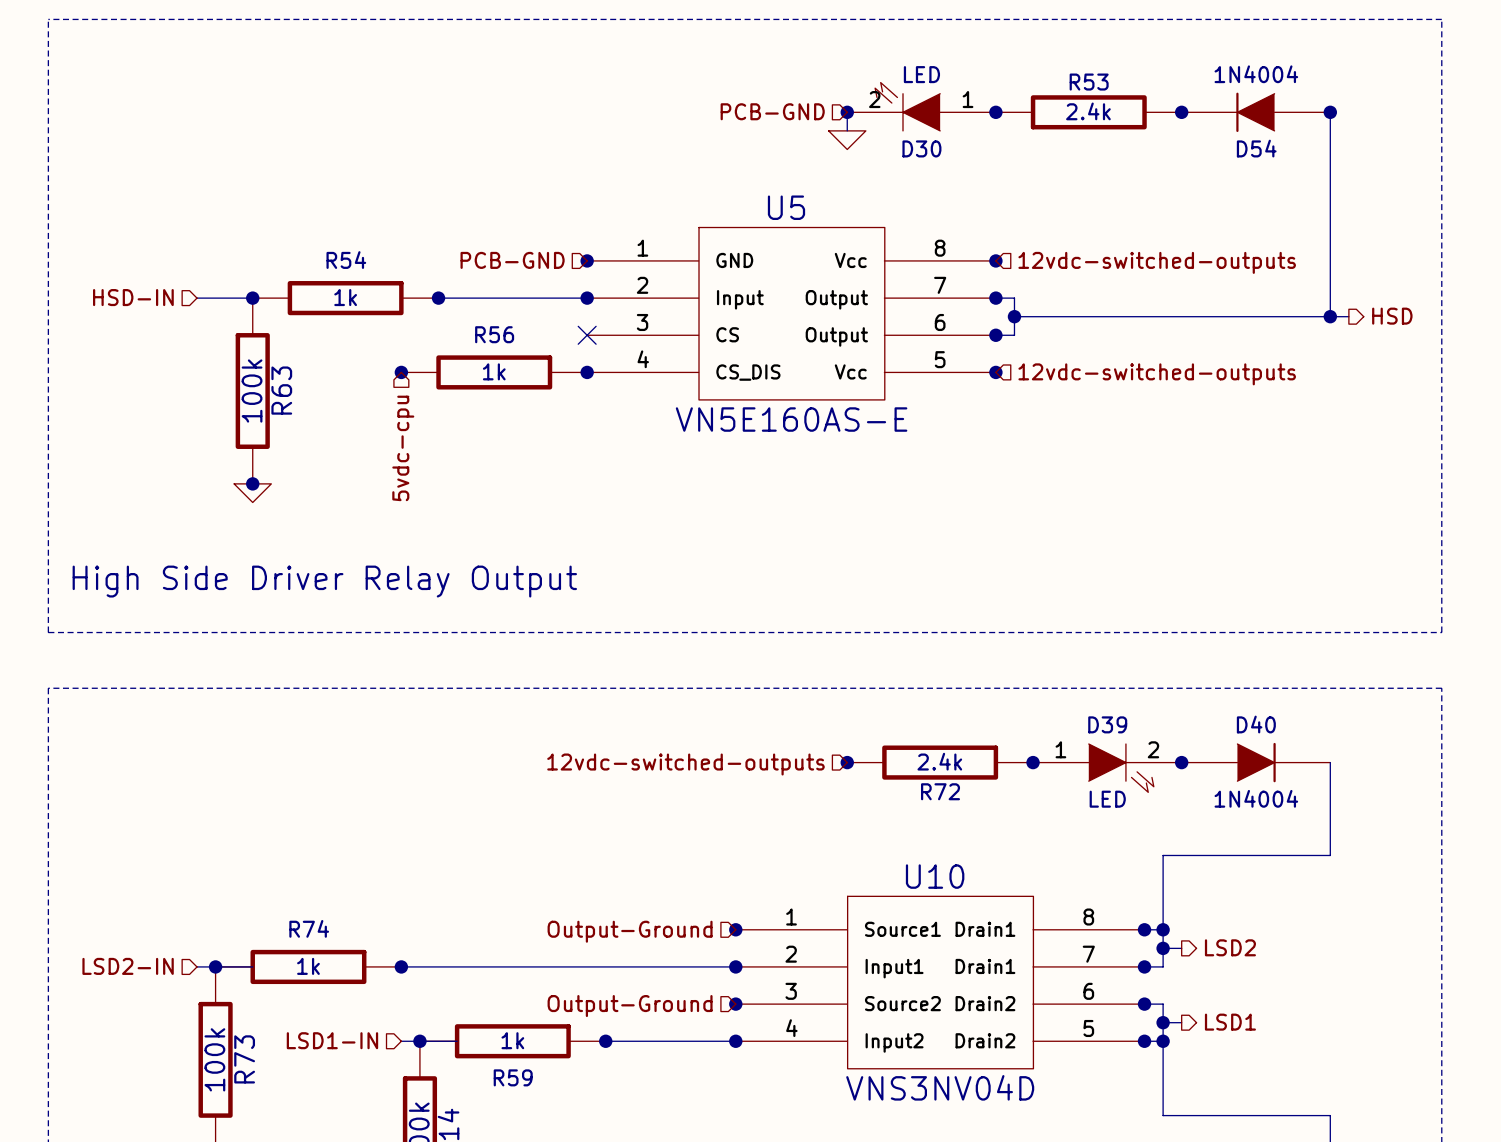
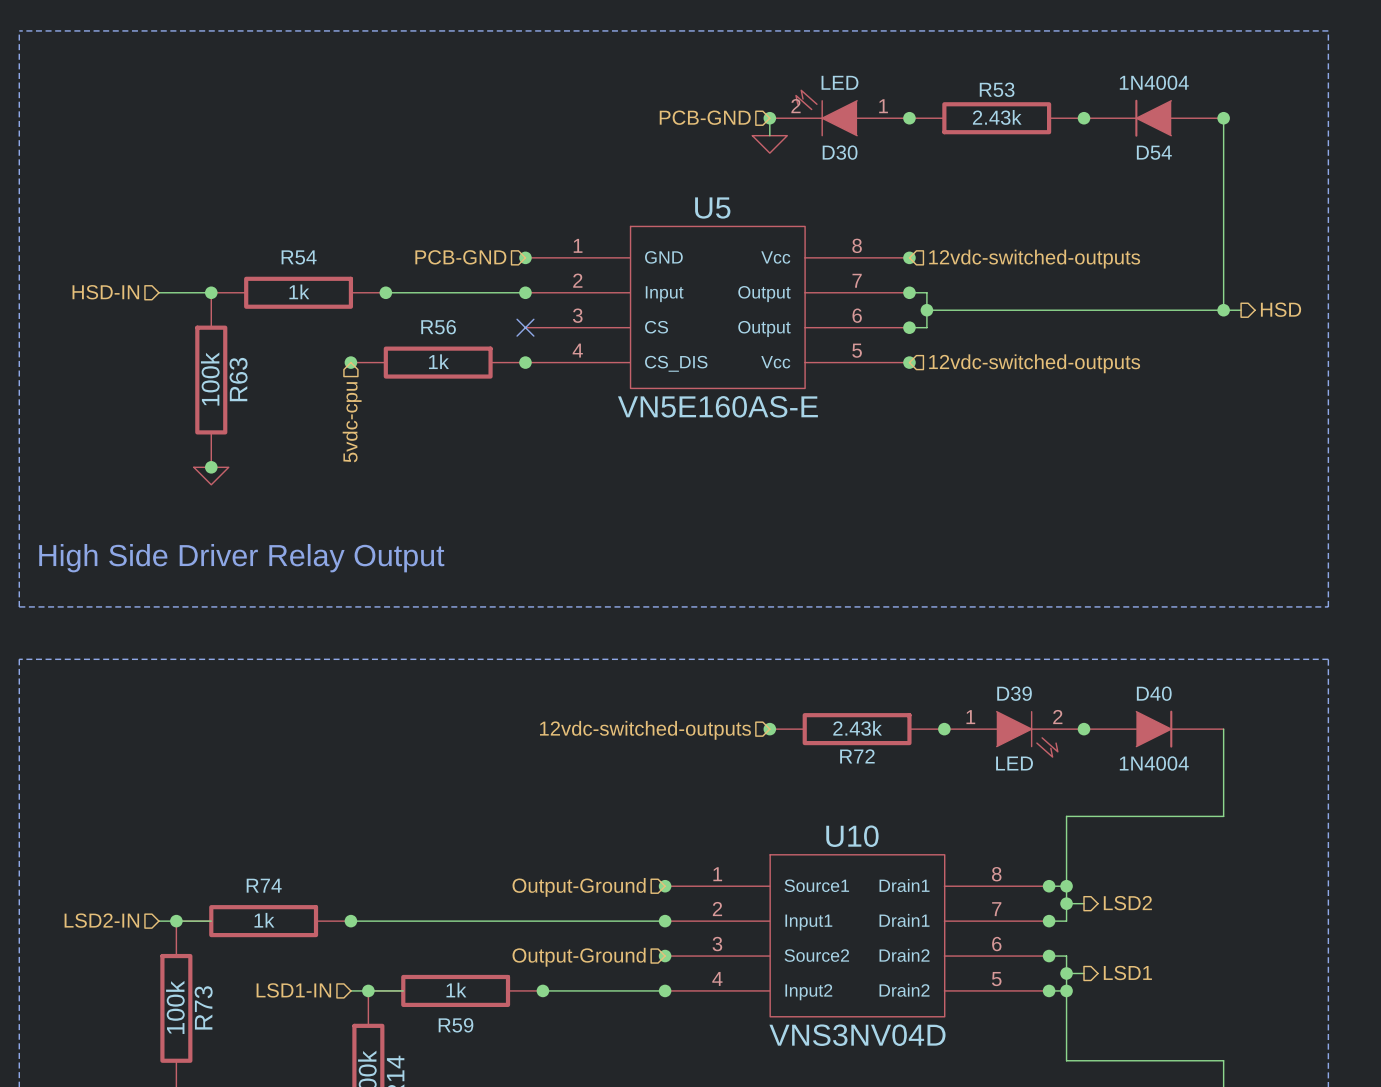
R53 value: 2.4k (1088, 111) -> 2.43k (997, 117)
R72 value: 2.4k (939, 761) -> 2.43k (857, 728)

